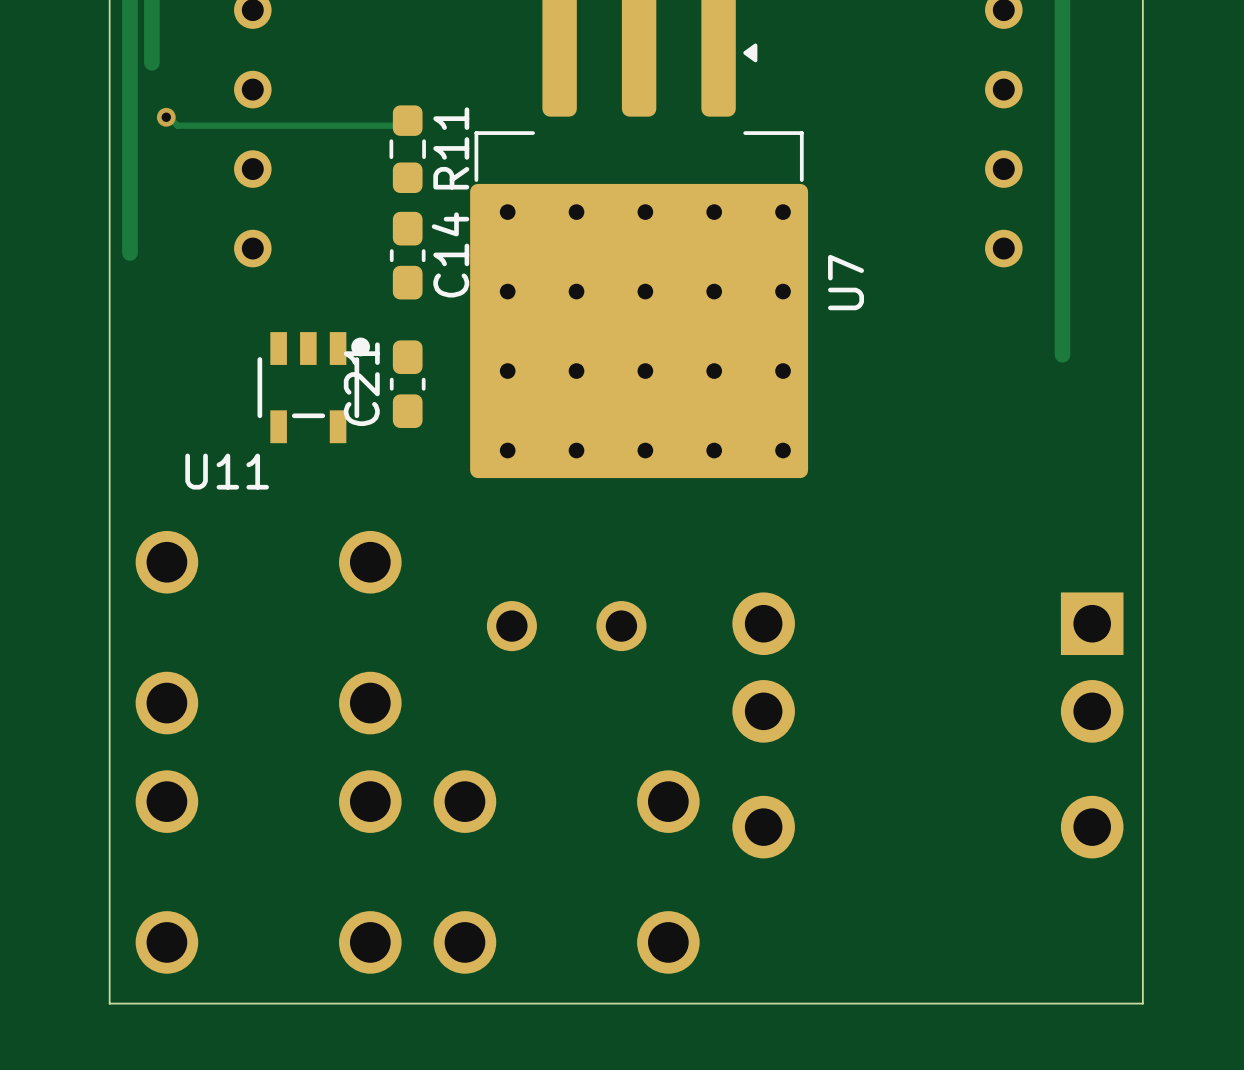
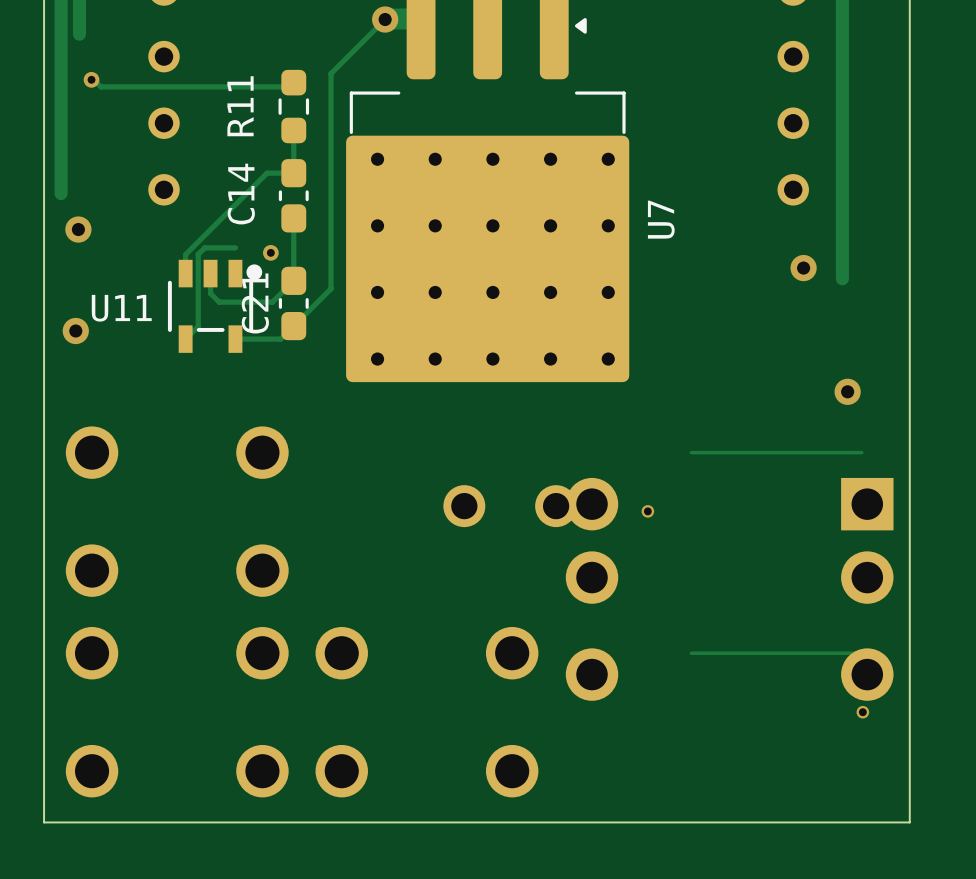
track: none -> (421, 19) (385, 19) (331, 73) (331, 288) (280, 339) (235, 339)
via: none -> (385, 19)
R11 name position: R11 (451, 148) -> R11 (240, 106)
track: none -> (293, 130) (293, 173) (267, 173) (185, 254) (185, 273)
C14 name position: C14 (450, 254) -> C14 (241, 194)
track: none -> (293, 218) (293, 280) (272, 302) (219, 302) (210, 293) (210, 273)
via: none -> (78, 229)
track: none -> (235, 247) (204, 247) (198, 254) (198, 326) (185, 339)
via: none -> (270, 252)
via: none -> (803, 268)
via: none -> (75, 330)
U11 name position: U11 (227, 471) -> U11 (121, 308)
via: none -> (847, 391)
track: none -> (691, 452) (861, 452)
part position: (566, 626) -> (510, 506)
via: none -> (647, 511)
track: none -> (691, 653) (861, 653)
via: none -> (862, 712)

